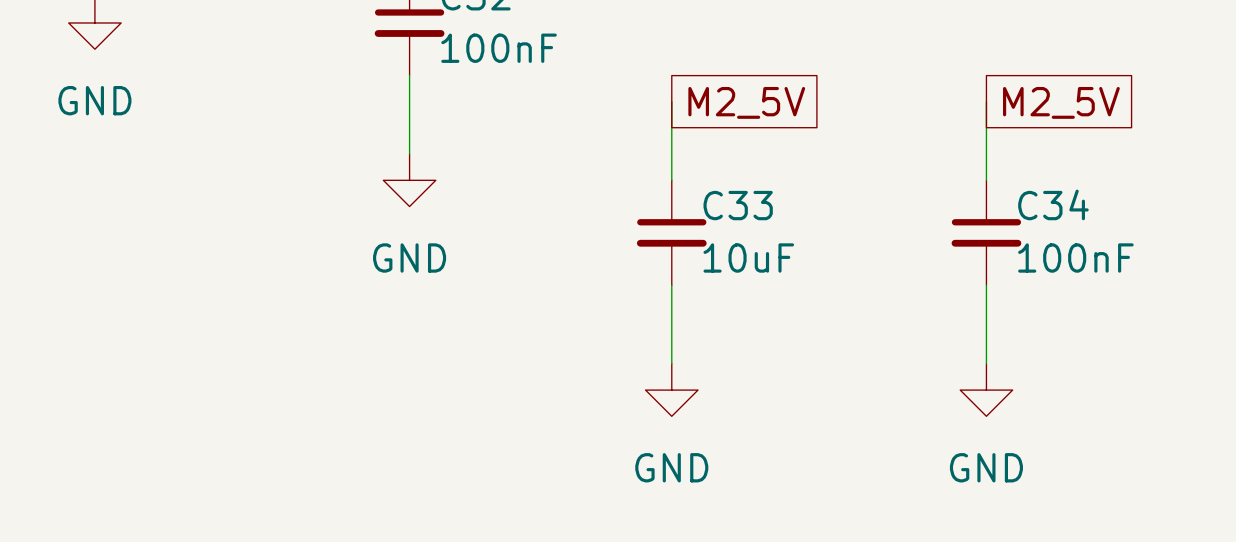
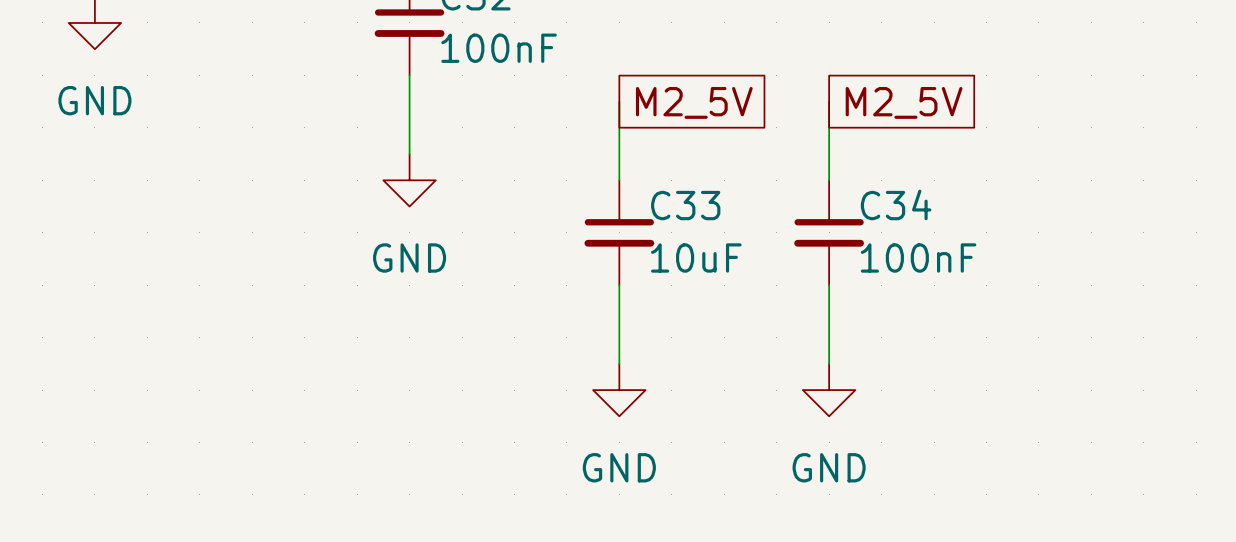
wire: (671, 101) (671, 180) -> (619, 101) (619, 180)
wire: (986, 101) (986, 180) -> (829, 101) (829, 180)
global label position: M2_5V (746, 102) -> M2_5V (694, 102)
global label position: M2_5V (1061, 102) -> M2_5V (904, 102)
C33 position: (671, 232) -> (619, 232)
C34 position: (986, 232) -> (829, 232)
wire: (671, 285) (671, 363) -> (619, 285) (619, 363)
wire: (986, 285) (986, 363) -> (829, 285) (829, 363)
power symbol position: GND (671, 390) -> GND (619, 390)
power symbol: none -> GND (829, 390)
power symbol: GND (986, 390) -> none

